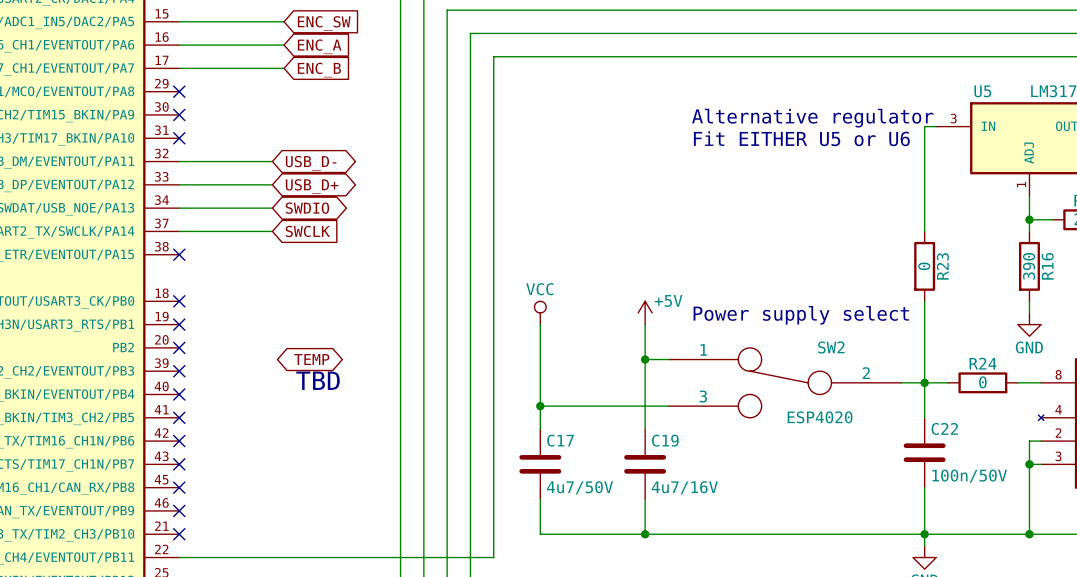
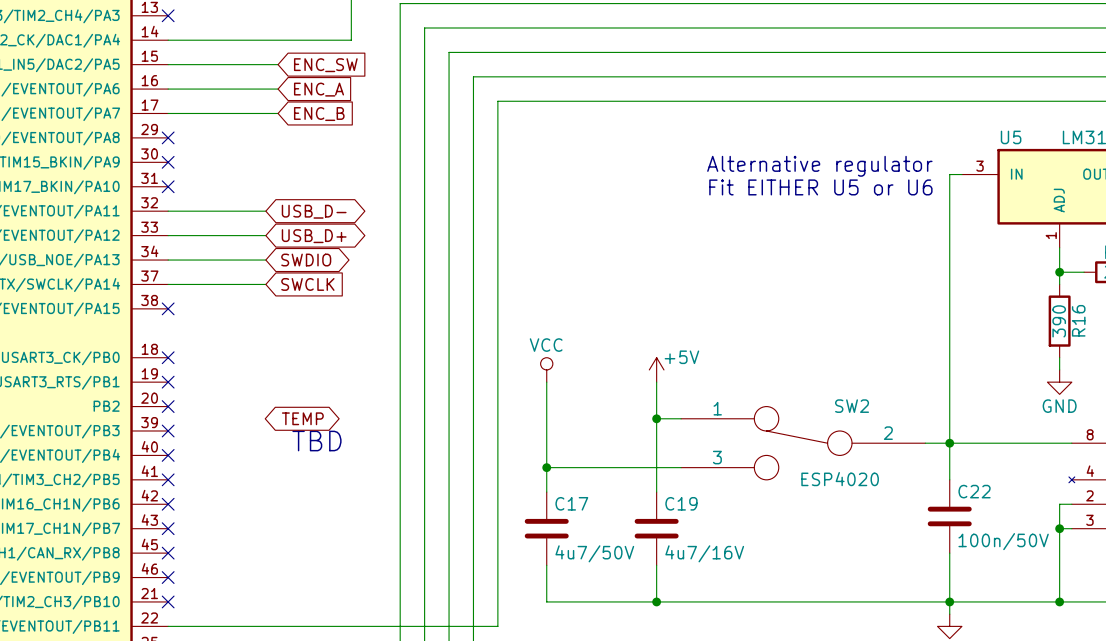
wire: none -> (949, 284) (949, 357)
R23: 0 (924, 266) -> none
text: Power supply select (801, 315) -> none
wire: none -> (974, 443) (1047, 443)
R24: 0 (982, 382) -> none

